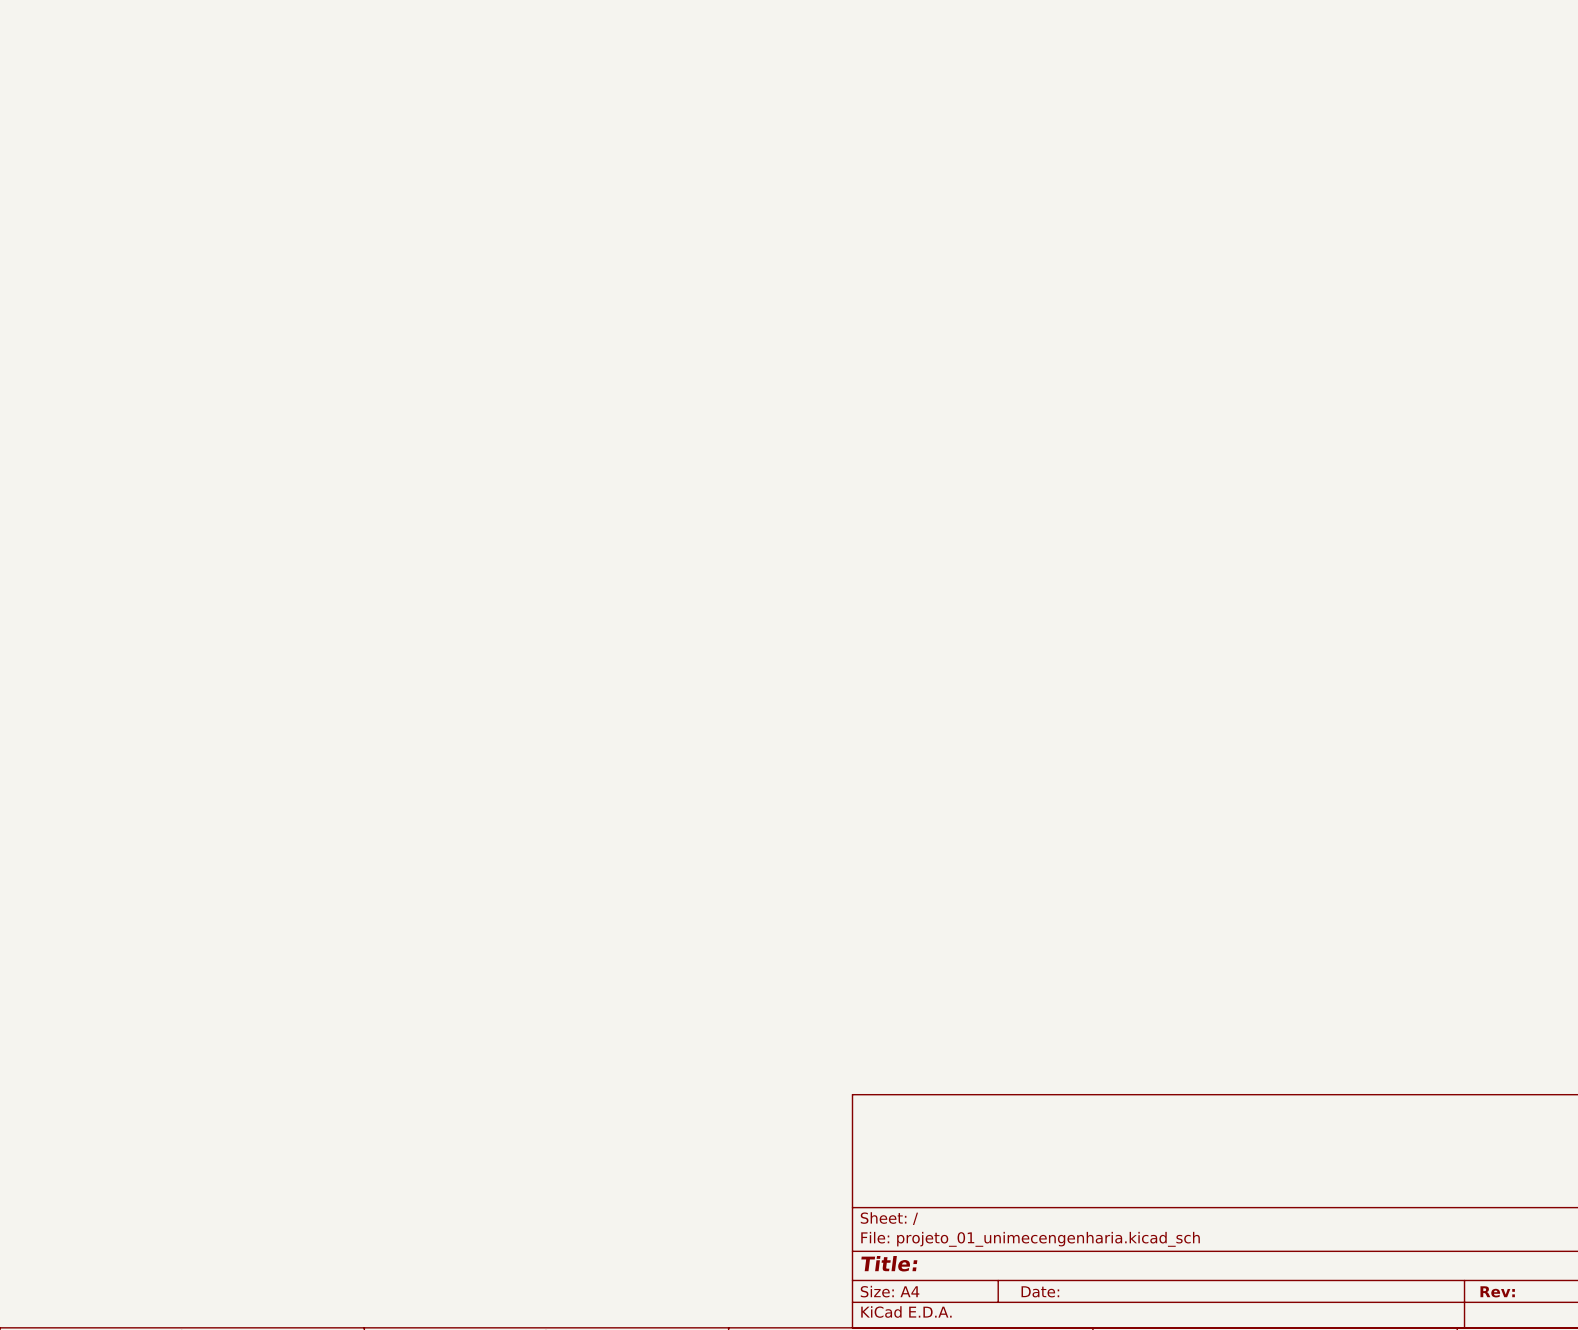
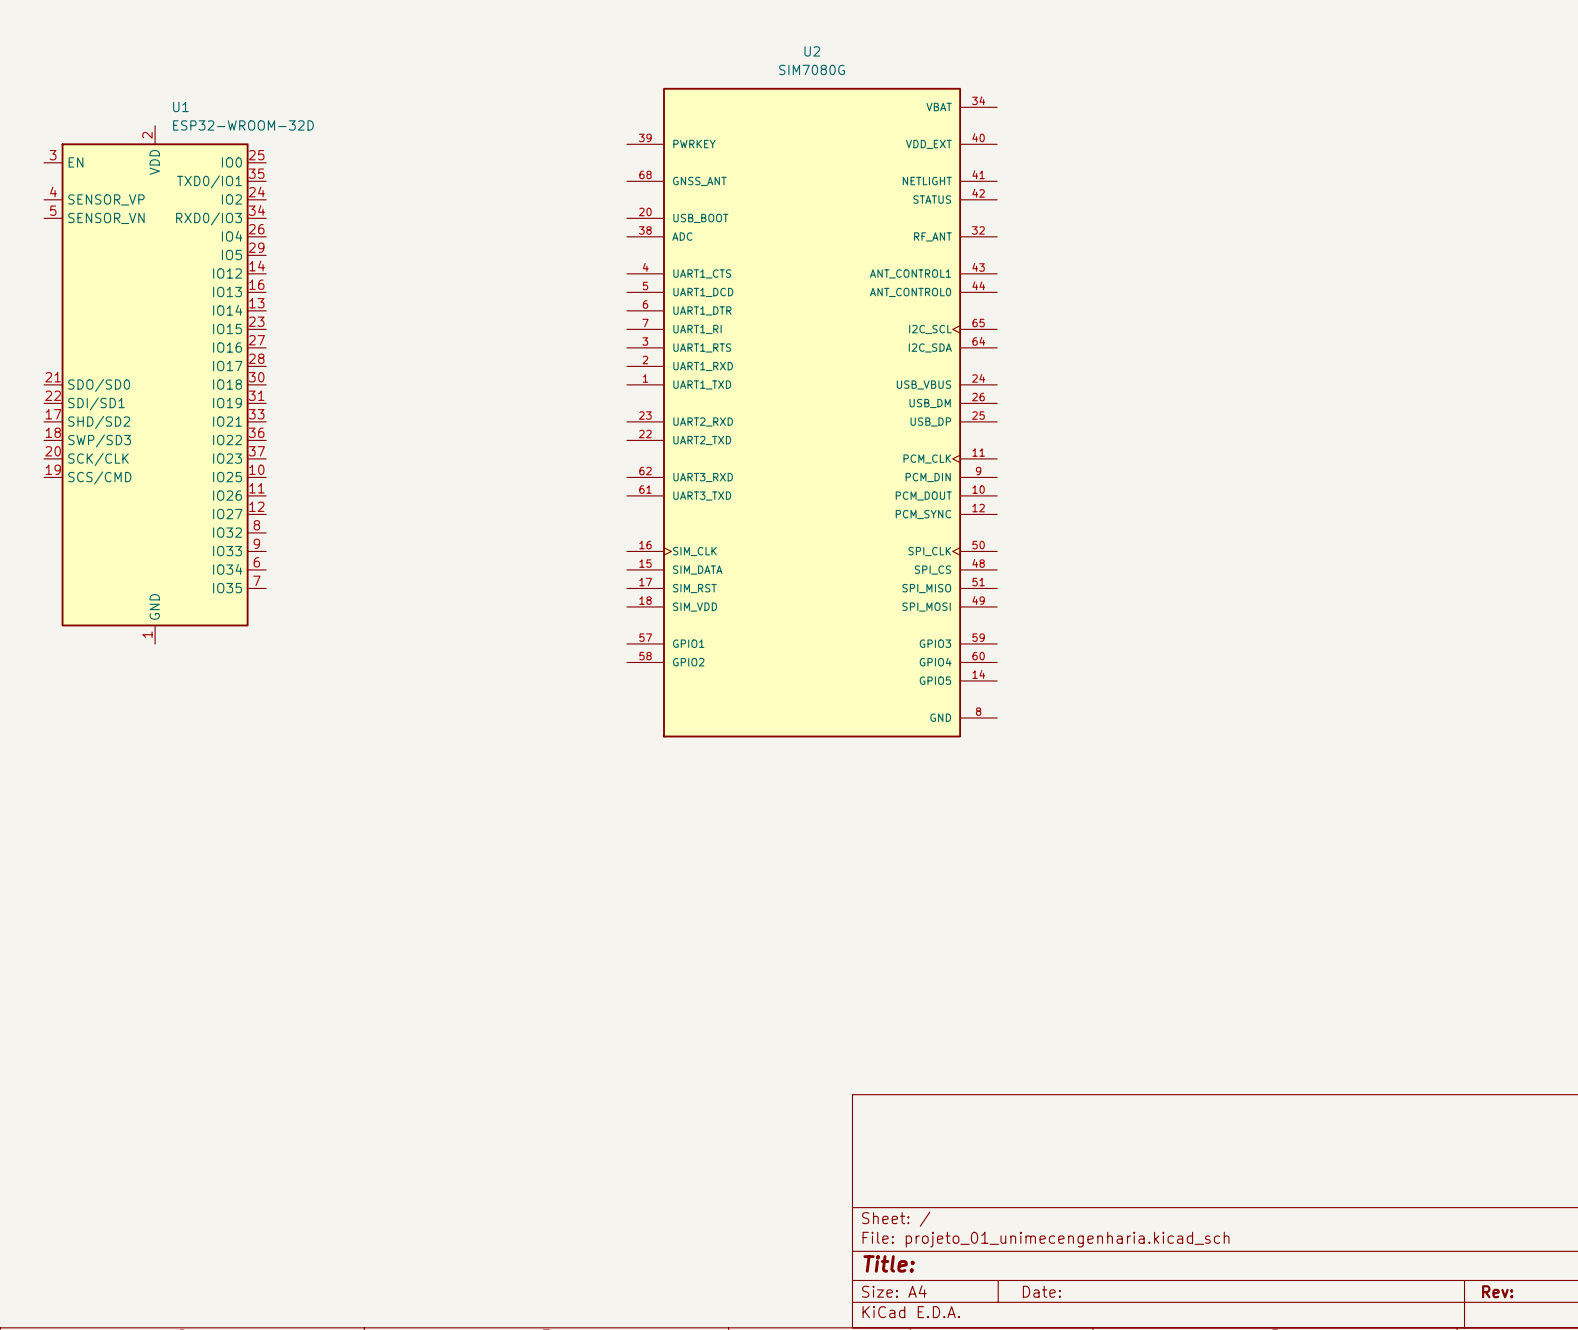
U1: none -> ESP32-WROOM-32D (155, 384)
U2: none -> SIM7080G (812, 412)

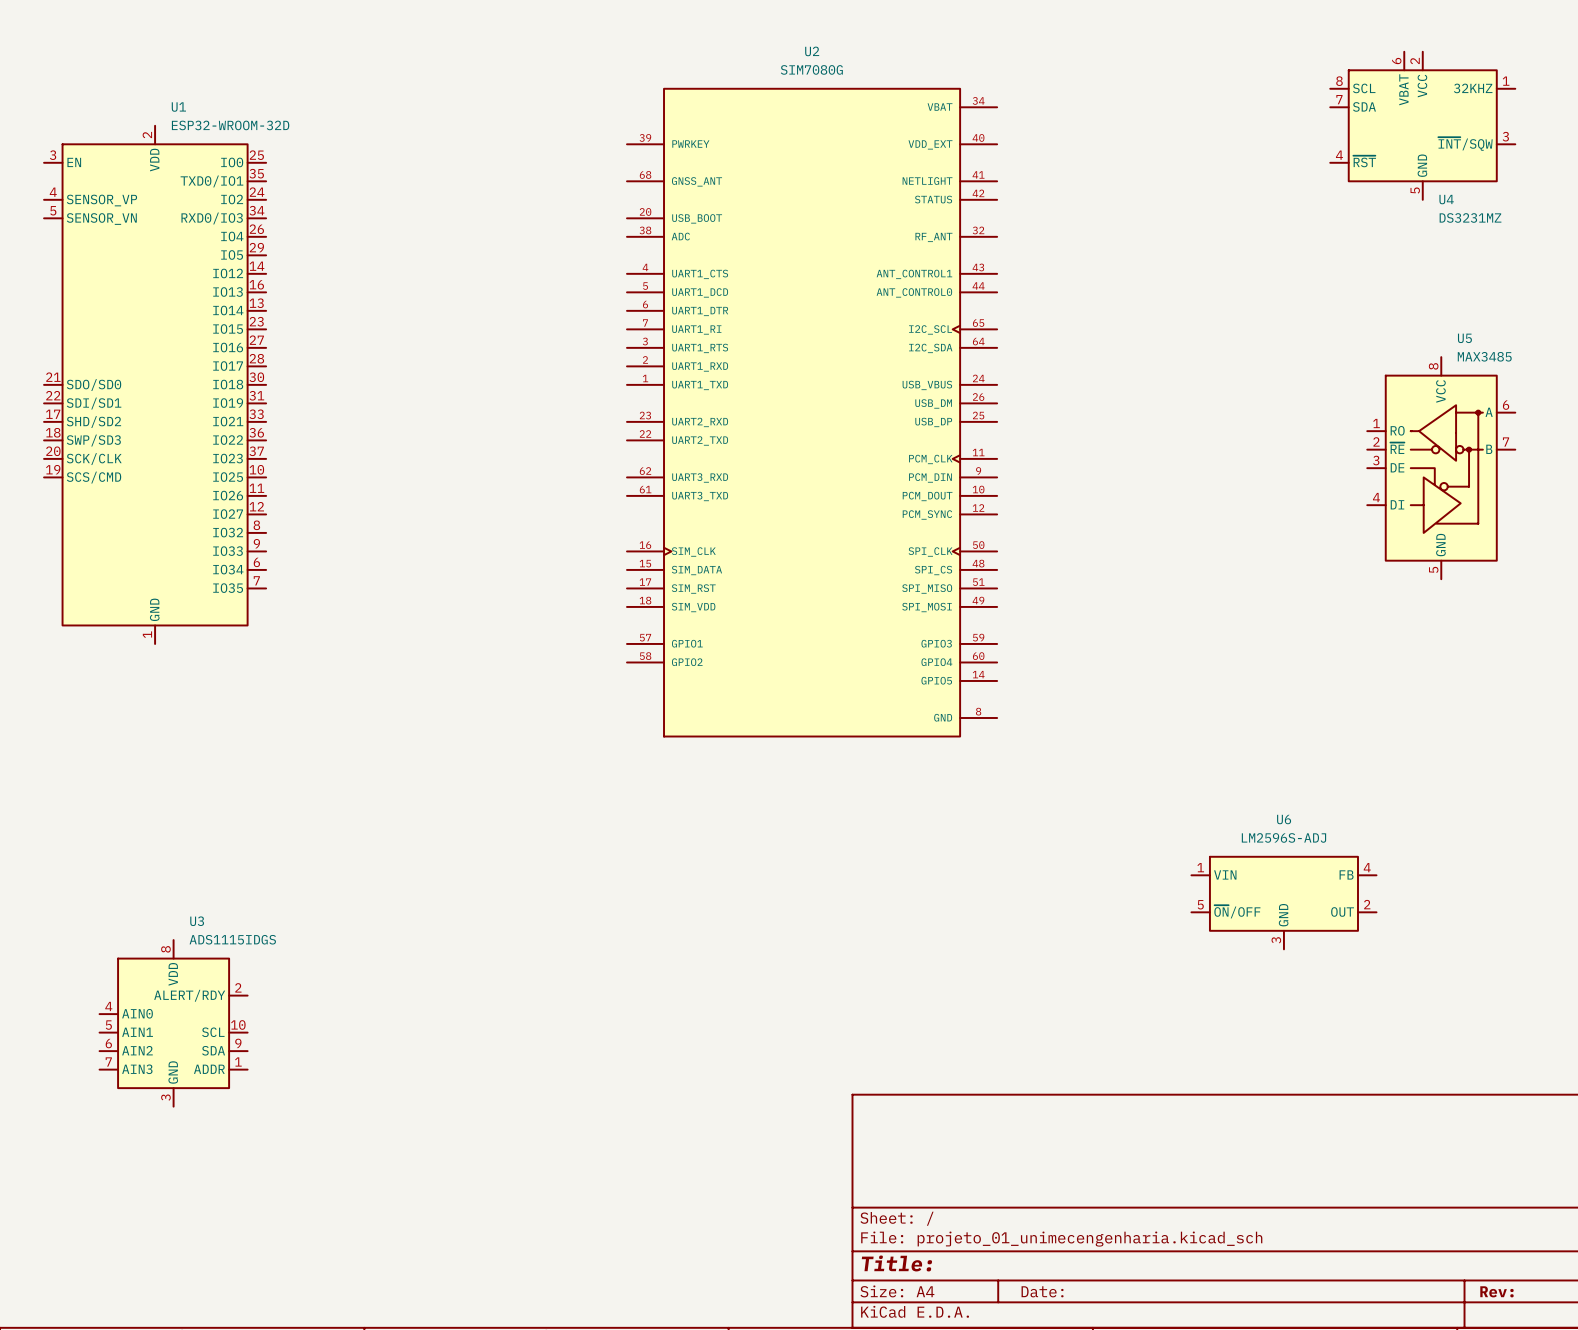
U4: none -> DS3231MZ (1422, 125)
U5: none -> MAX3485 (1441, 468)
U6: none -> LM2596S-ADJ (1283, 902)
U3: none -> ADS1115IDGS (173, 1023)

